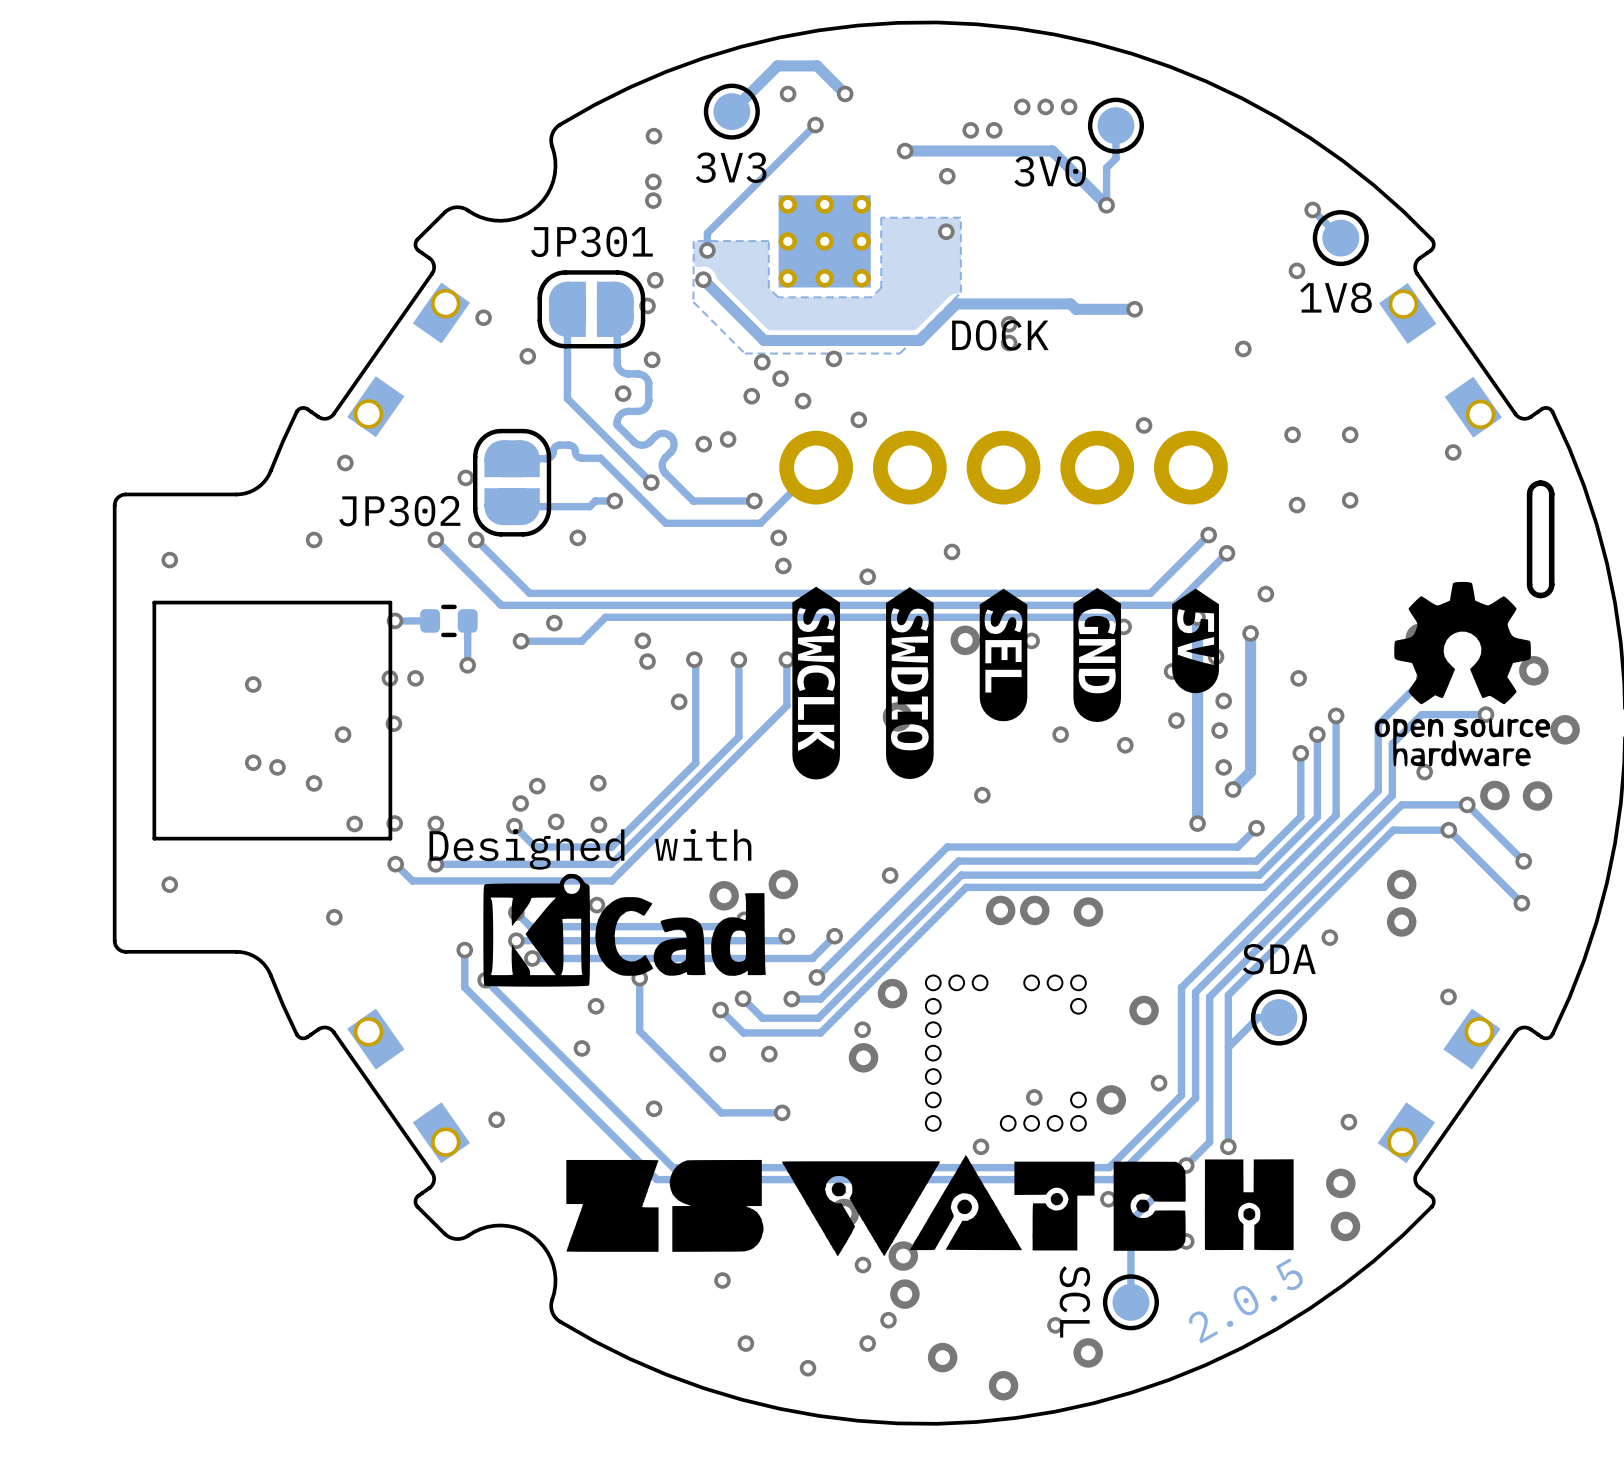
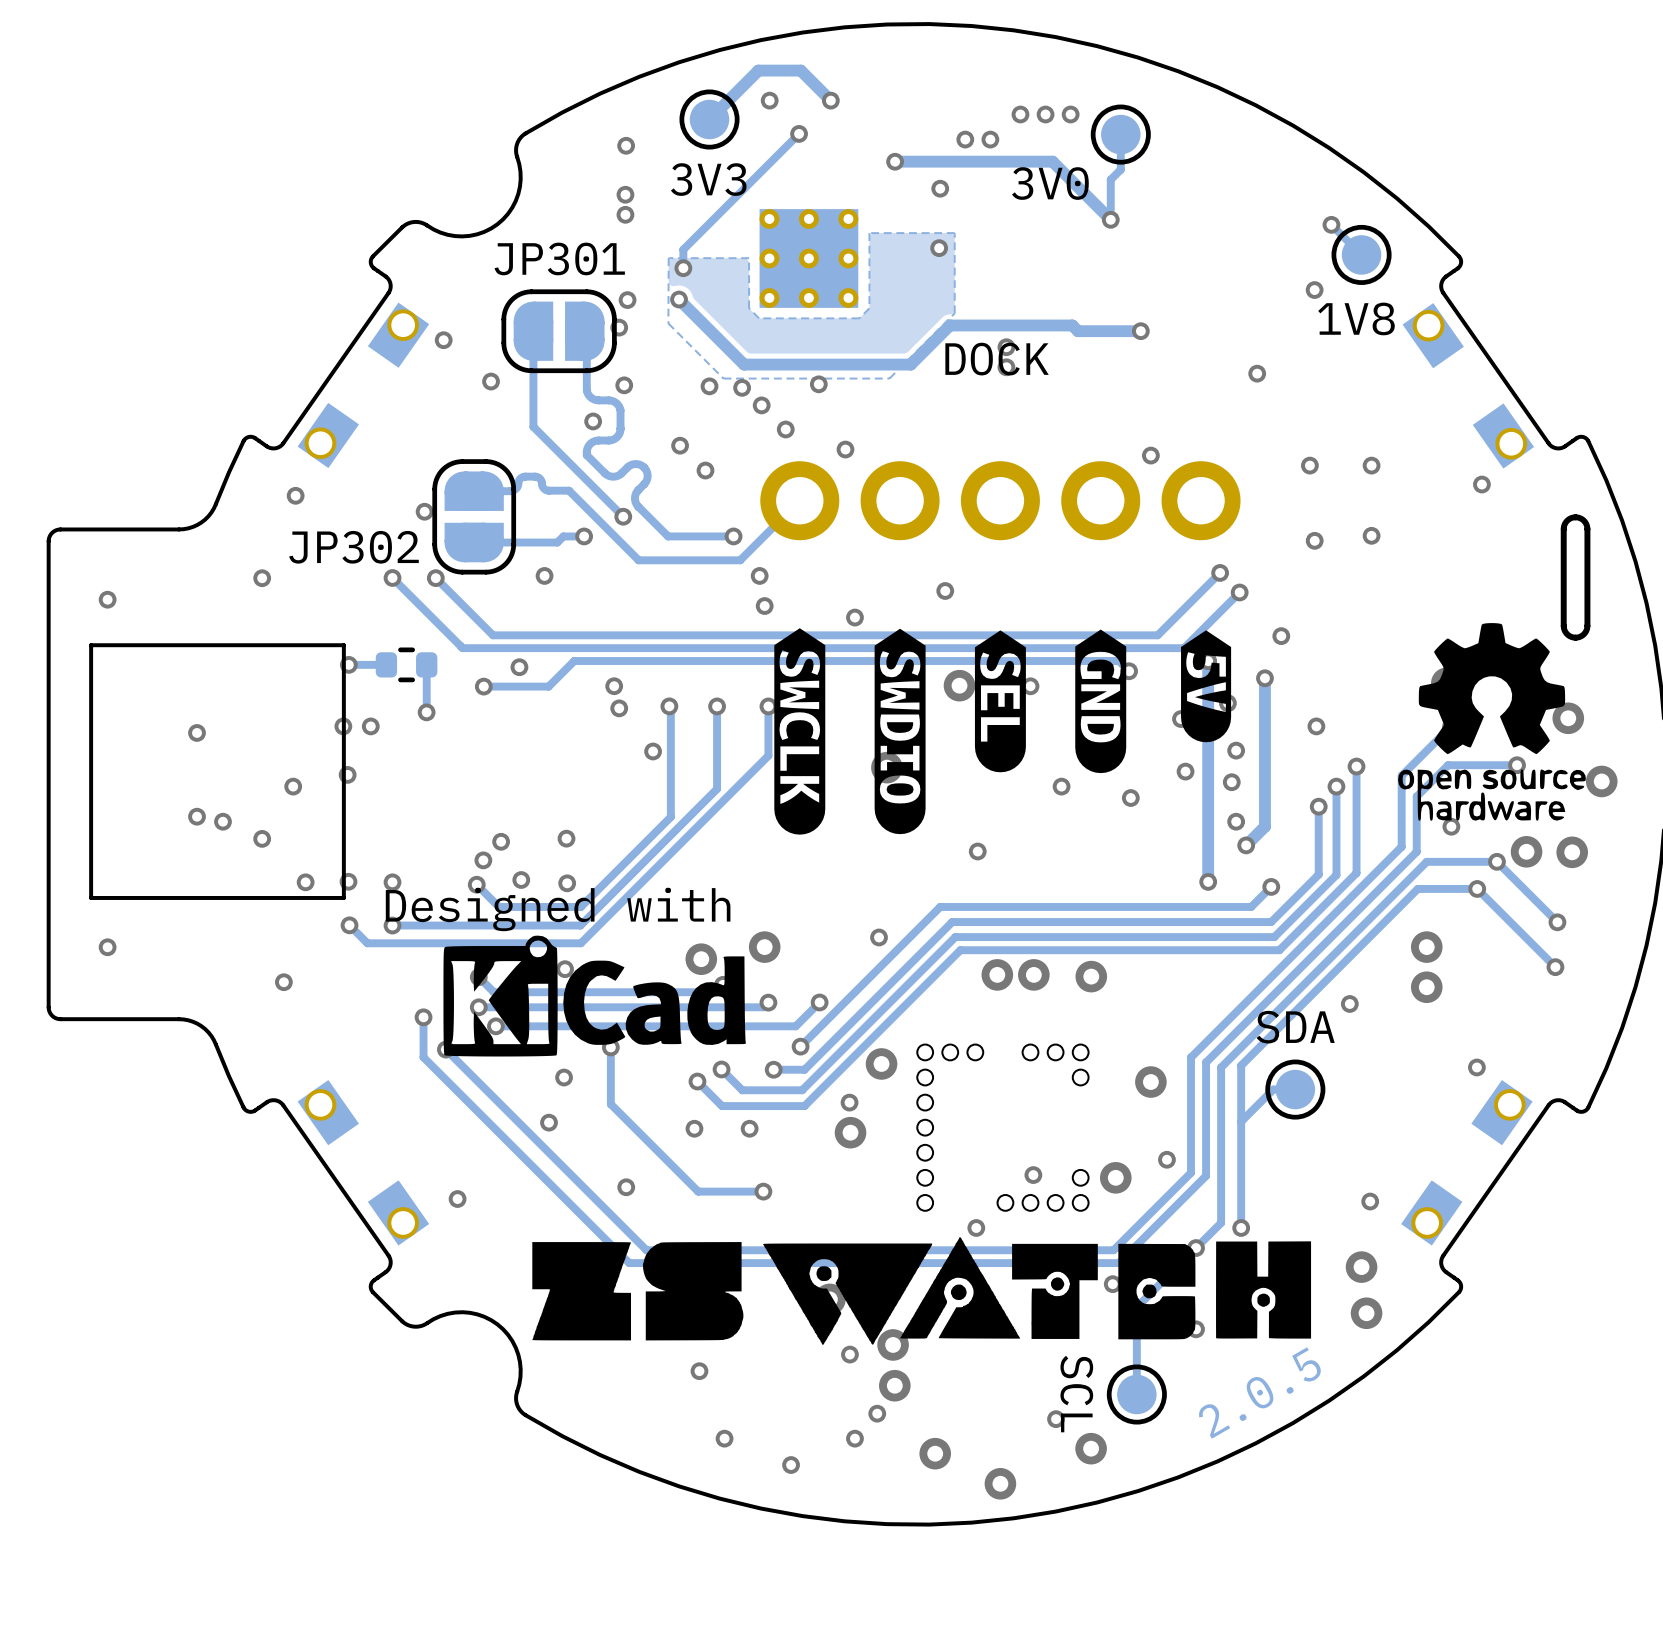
via: none -> (709, 386)
via: (751, 396) -> none
via: none -> (680, 445)
via: (703, 444) -> none

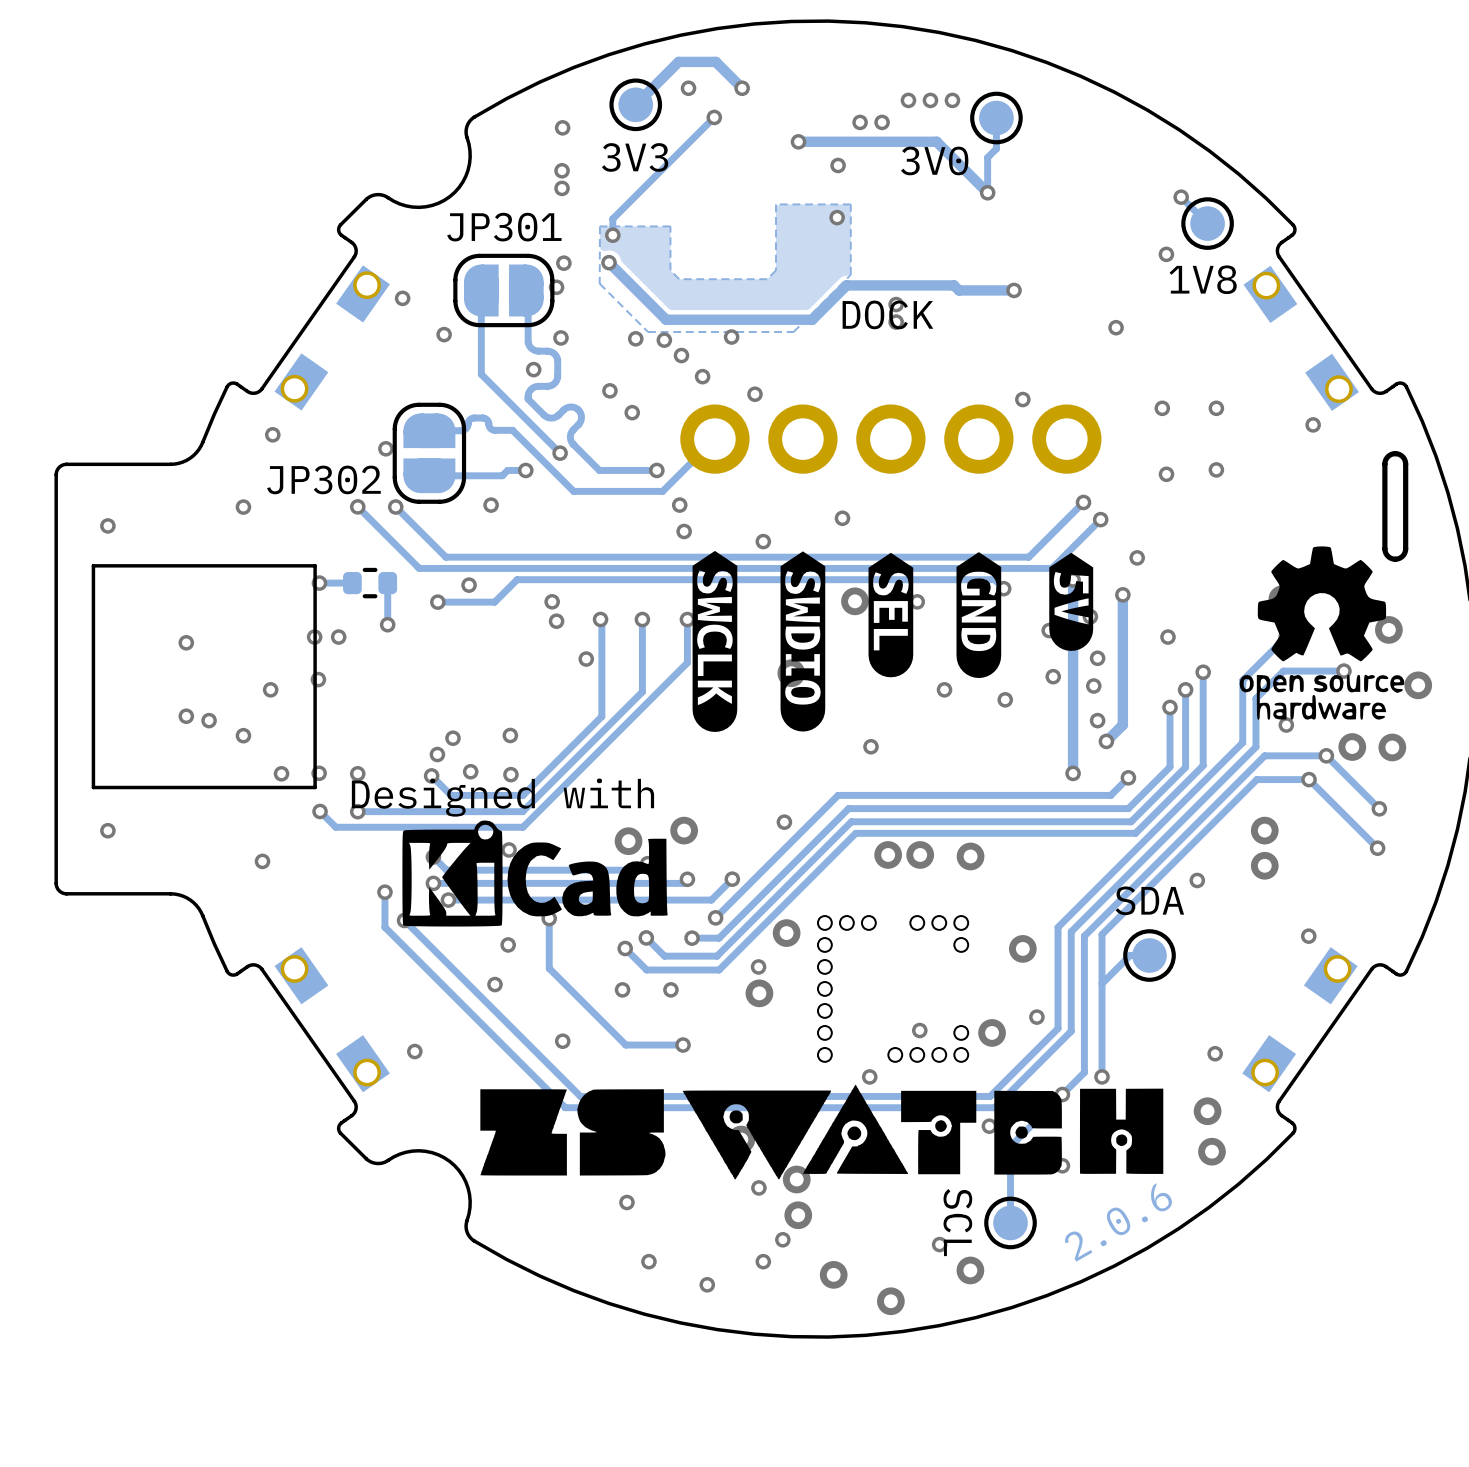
part: (808, 258) -> none
text: 2.0.5 (1260, 1393) -> 2.0.6 (1118, 1222)

